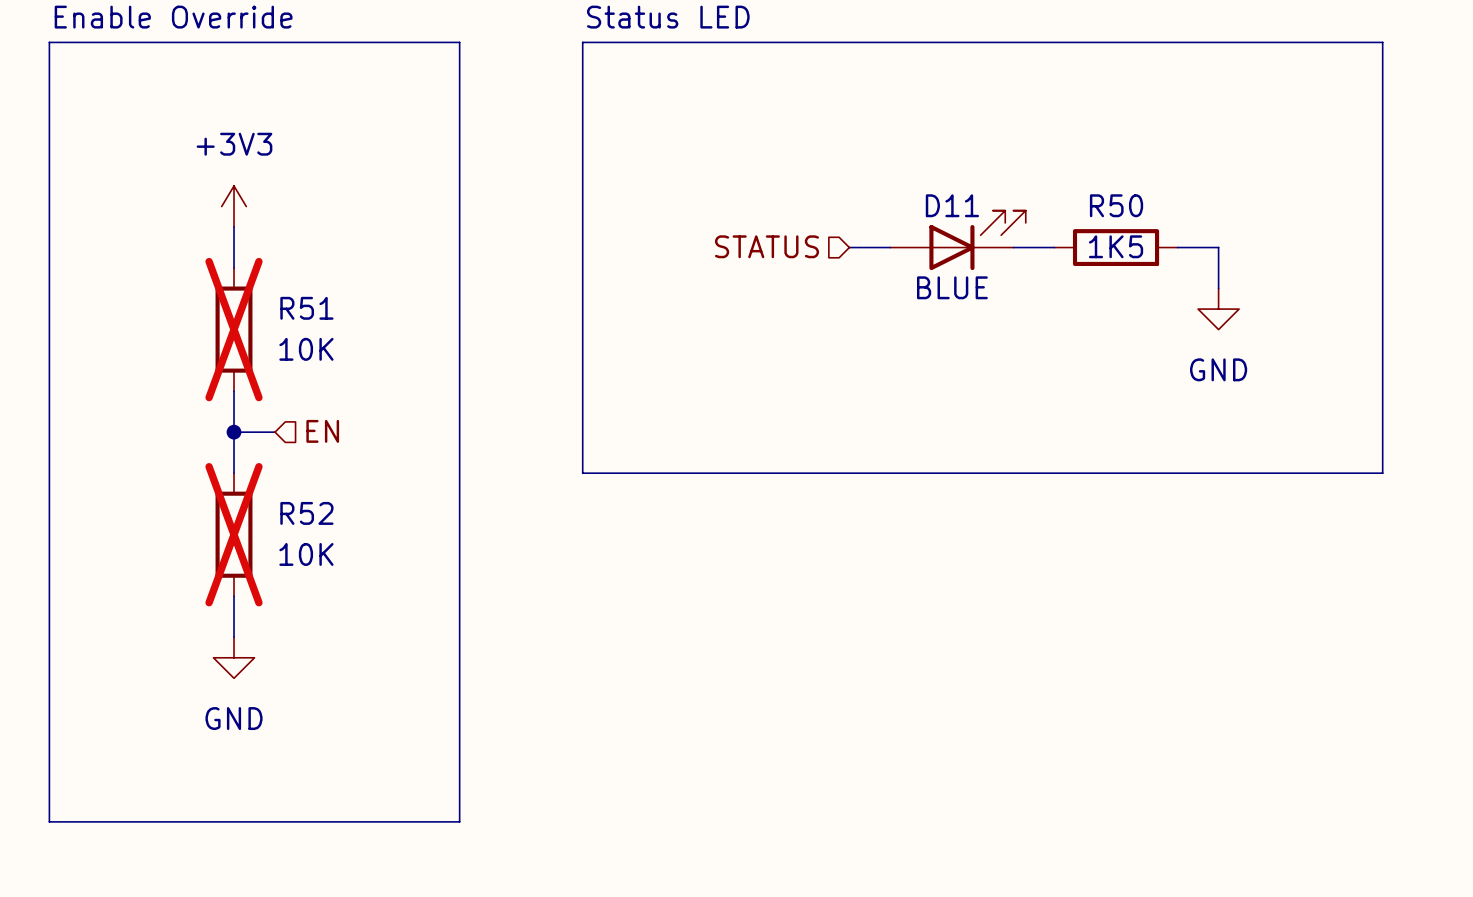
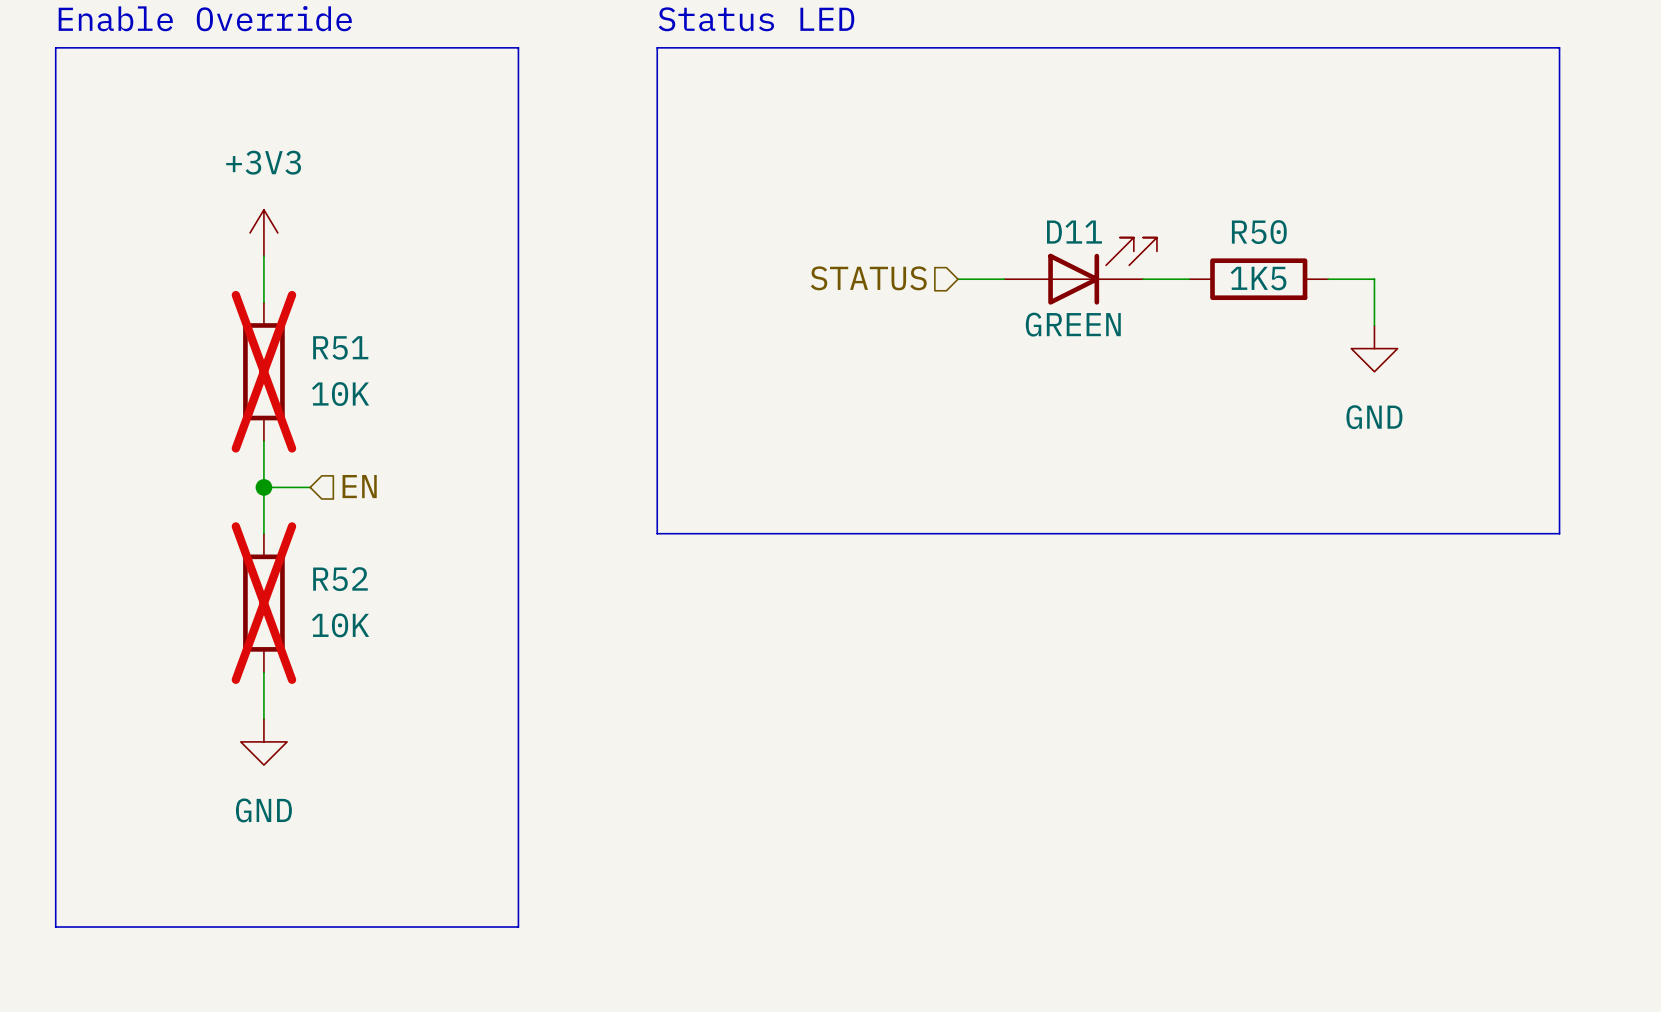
D11 value: BLUE (952, 287) -> GREEN (1073, 324)

